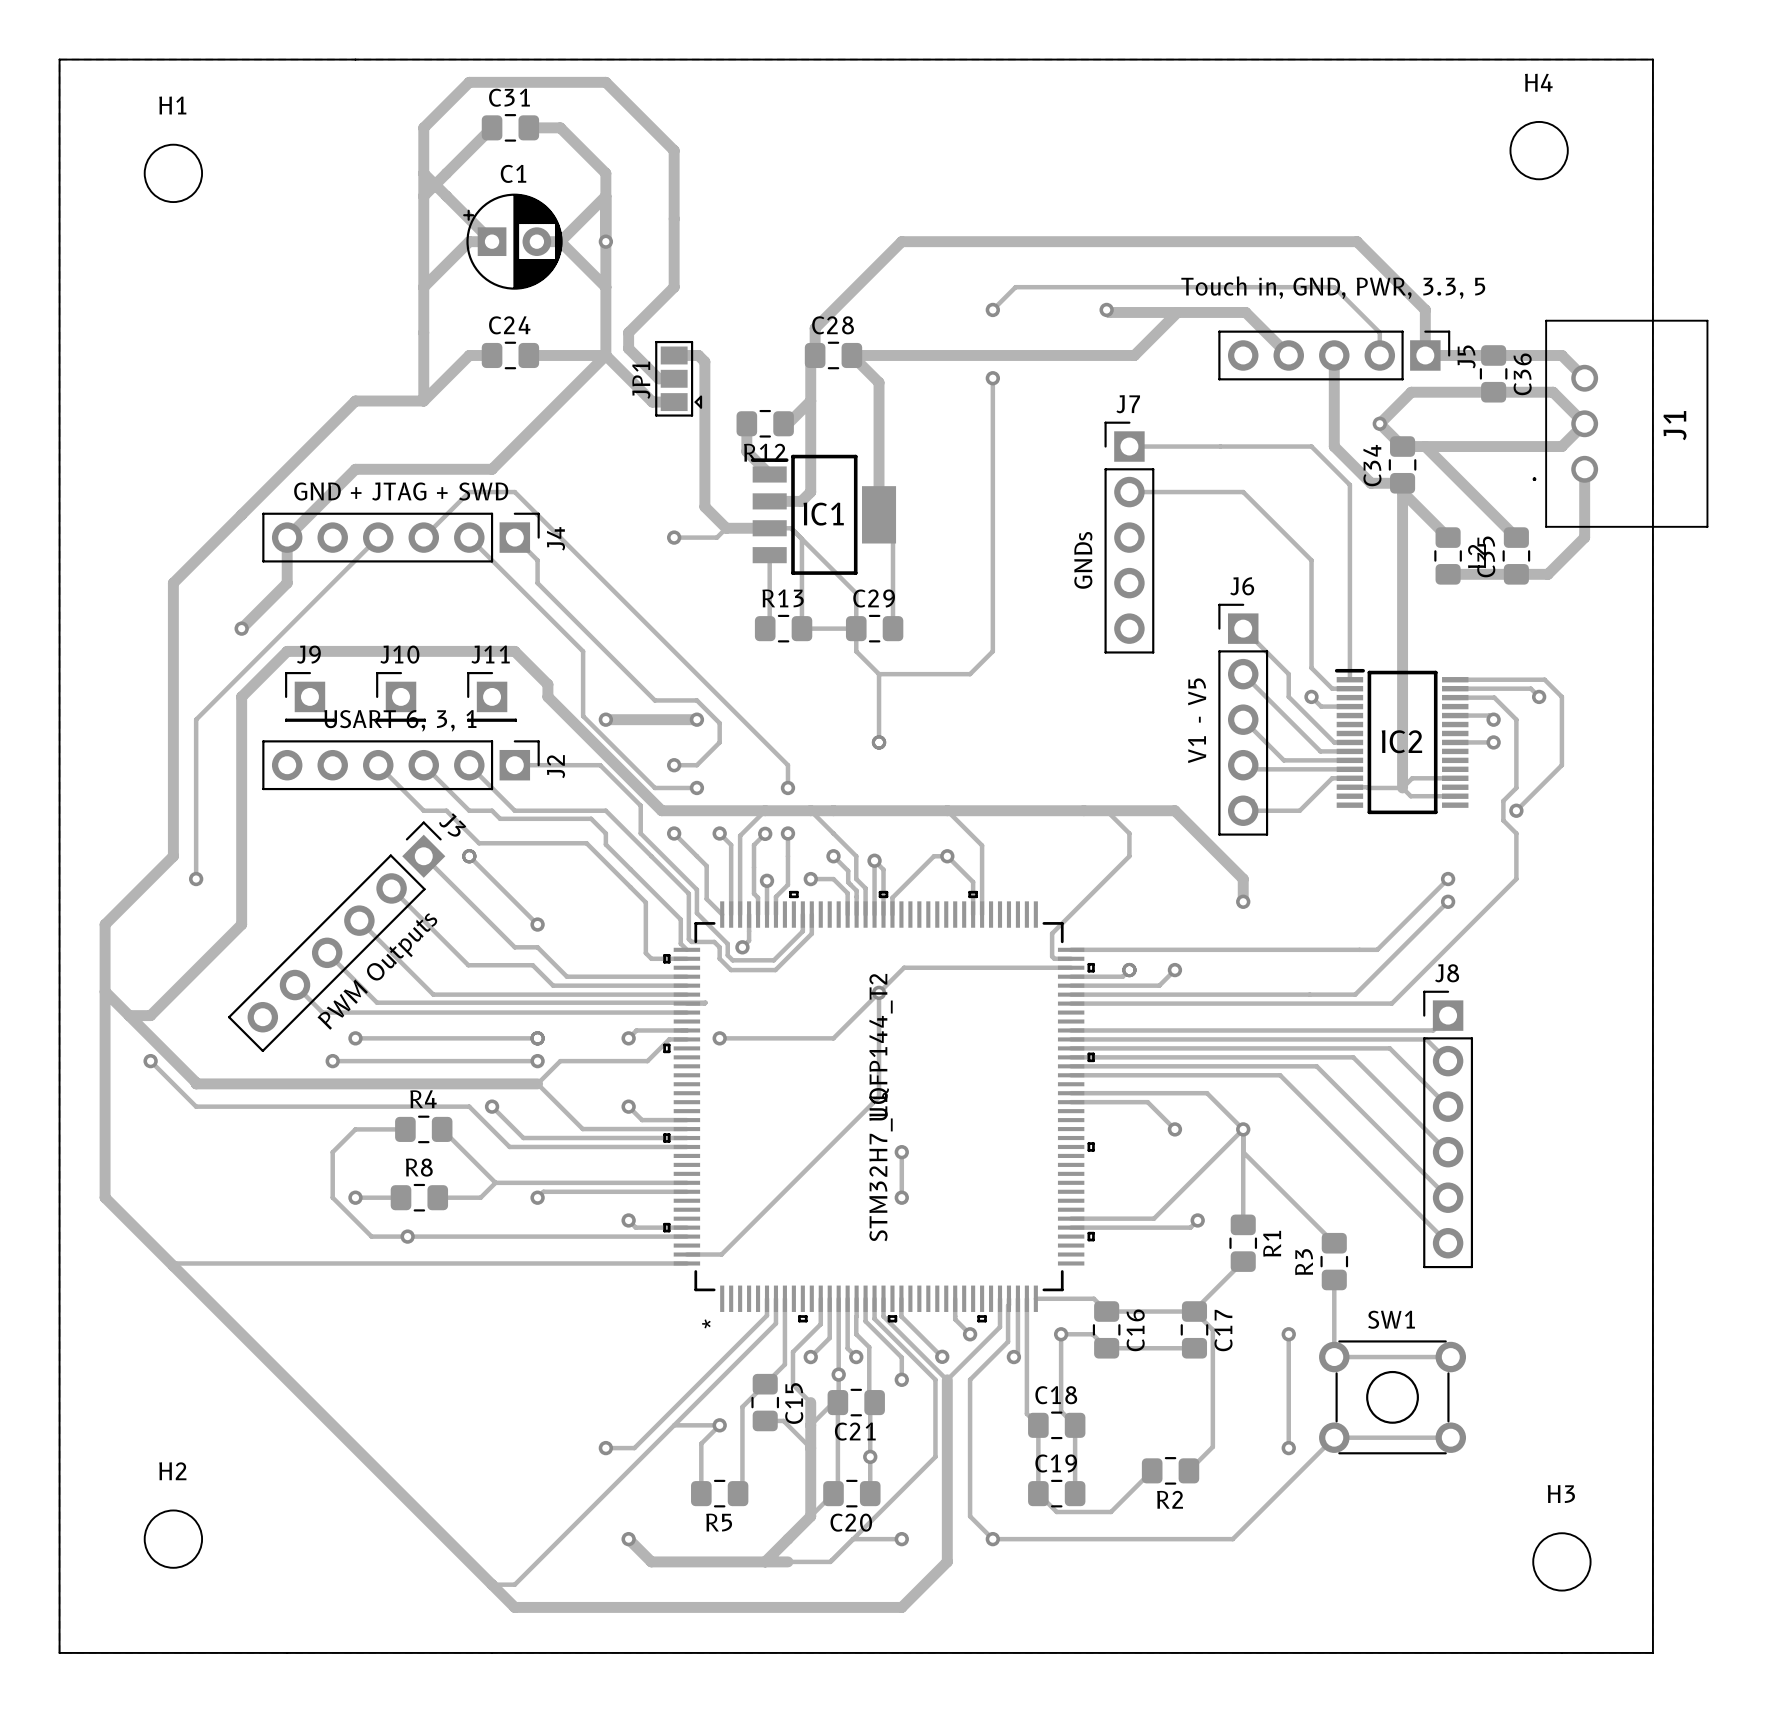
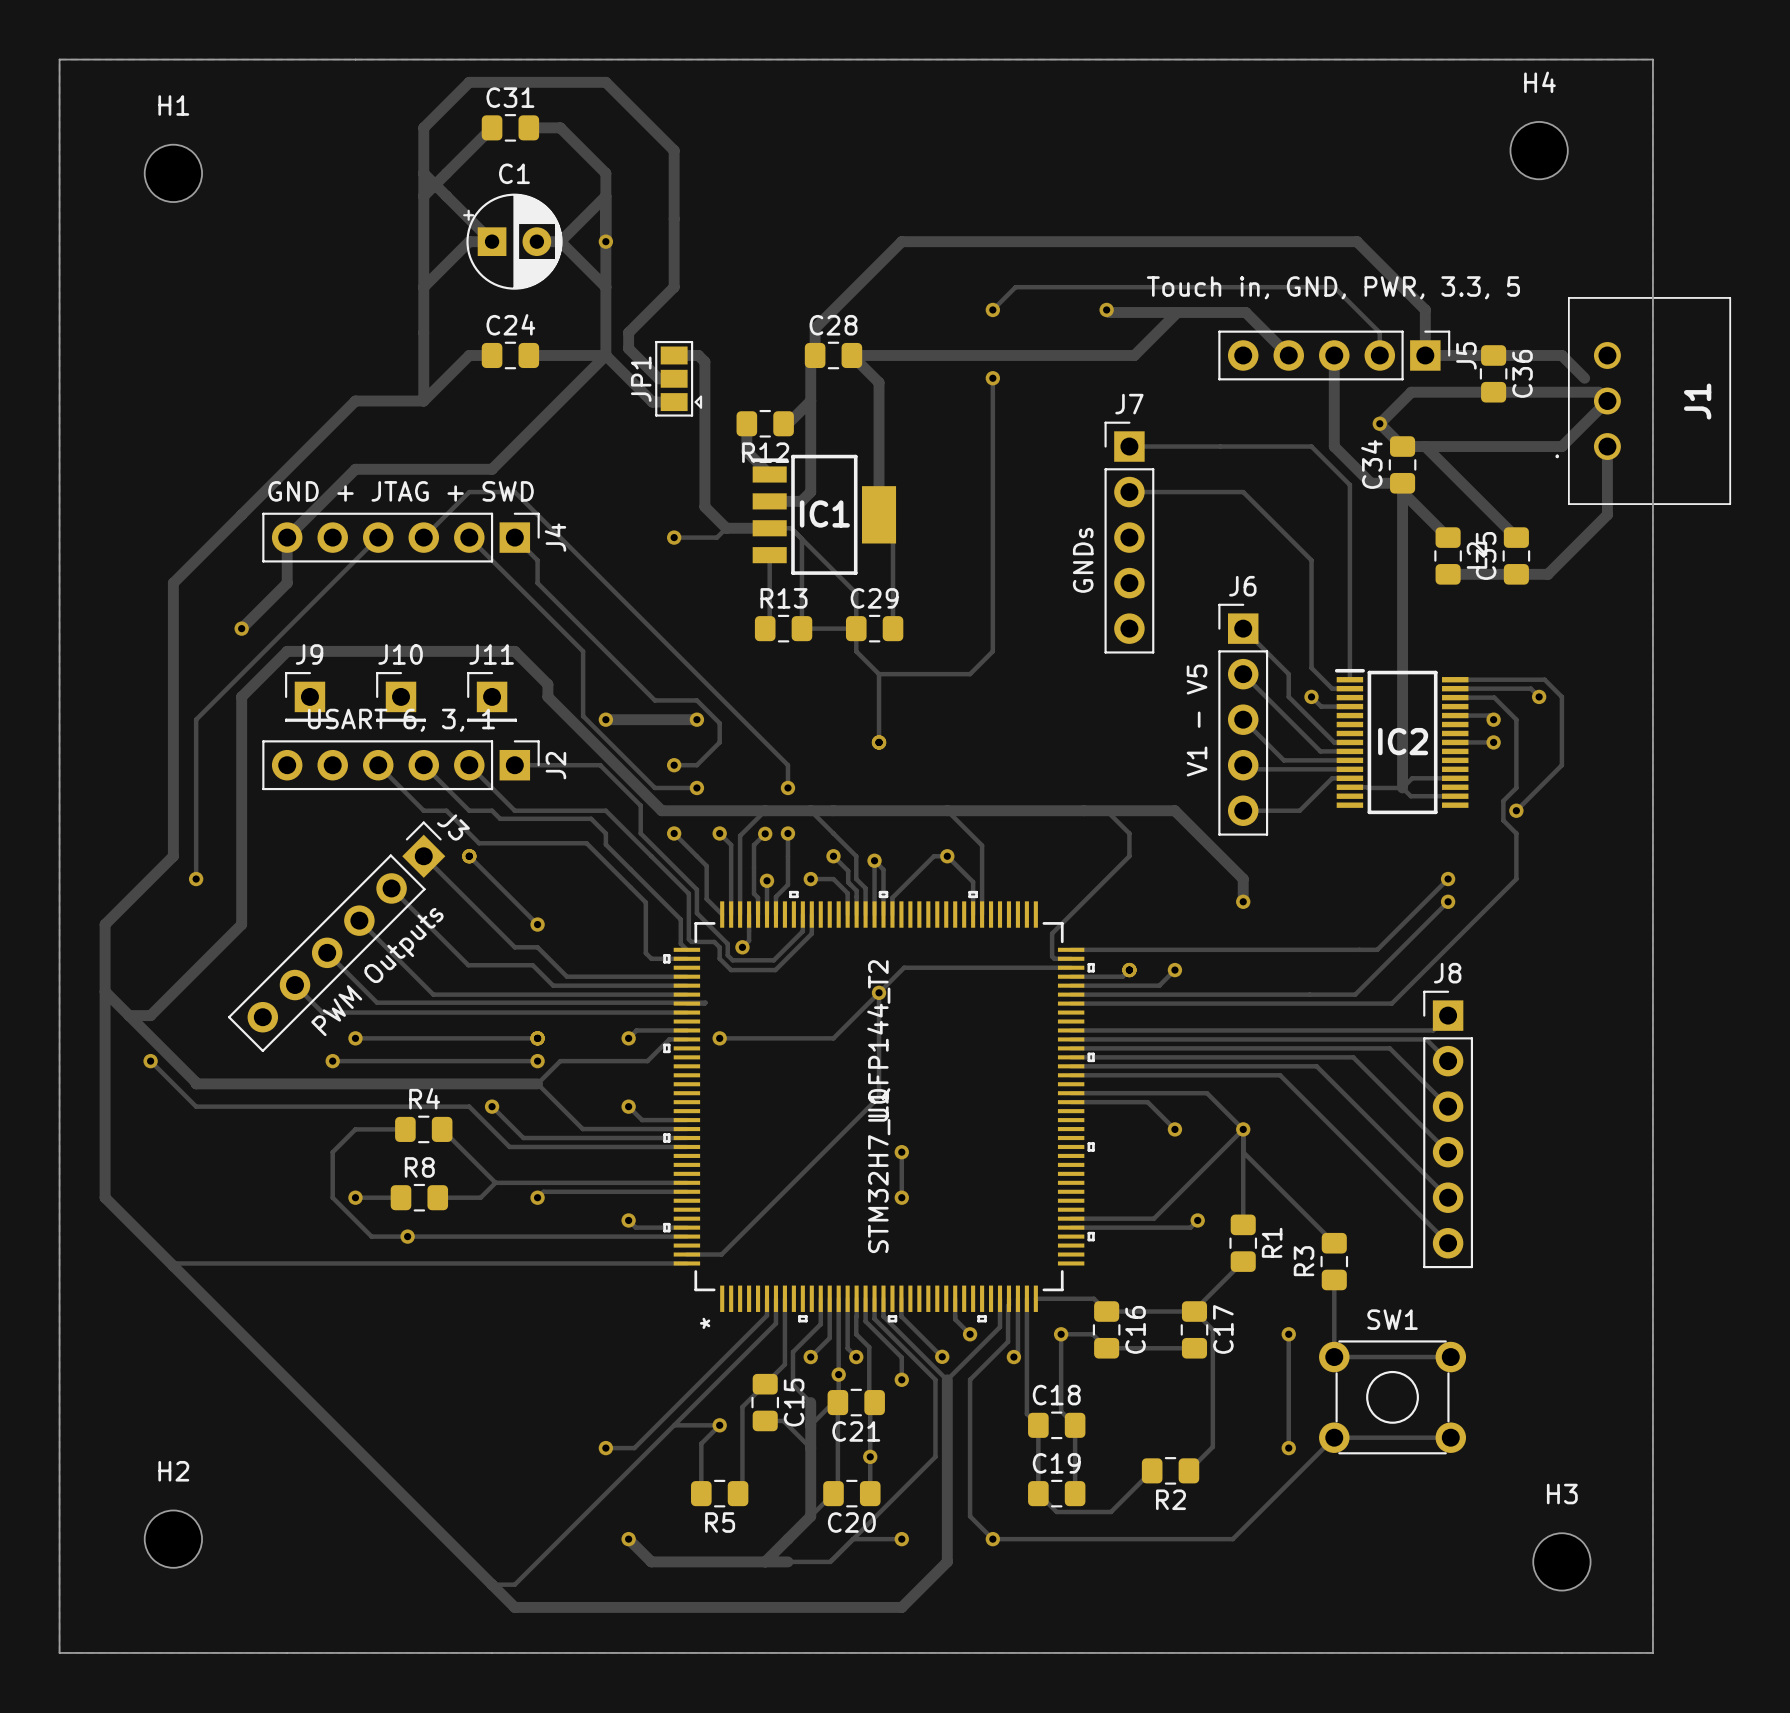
track: (1553, 392) (1584, 423) -> (1553, 392) (1598, 392) (1607, 401) (1584, 423)
J1 position: (1620, 423) -> (1643, 401)
track: (1584, 469) (1584, 537) -> (1607, 446) (1607, 514) (1584, 537)

